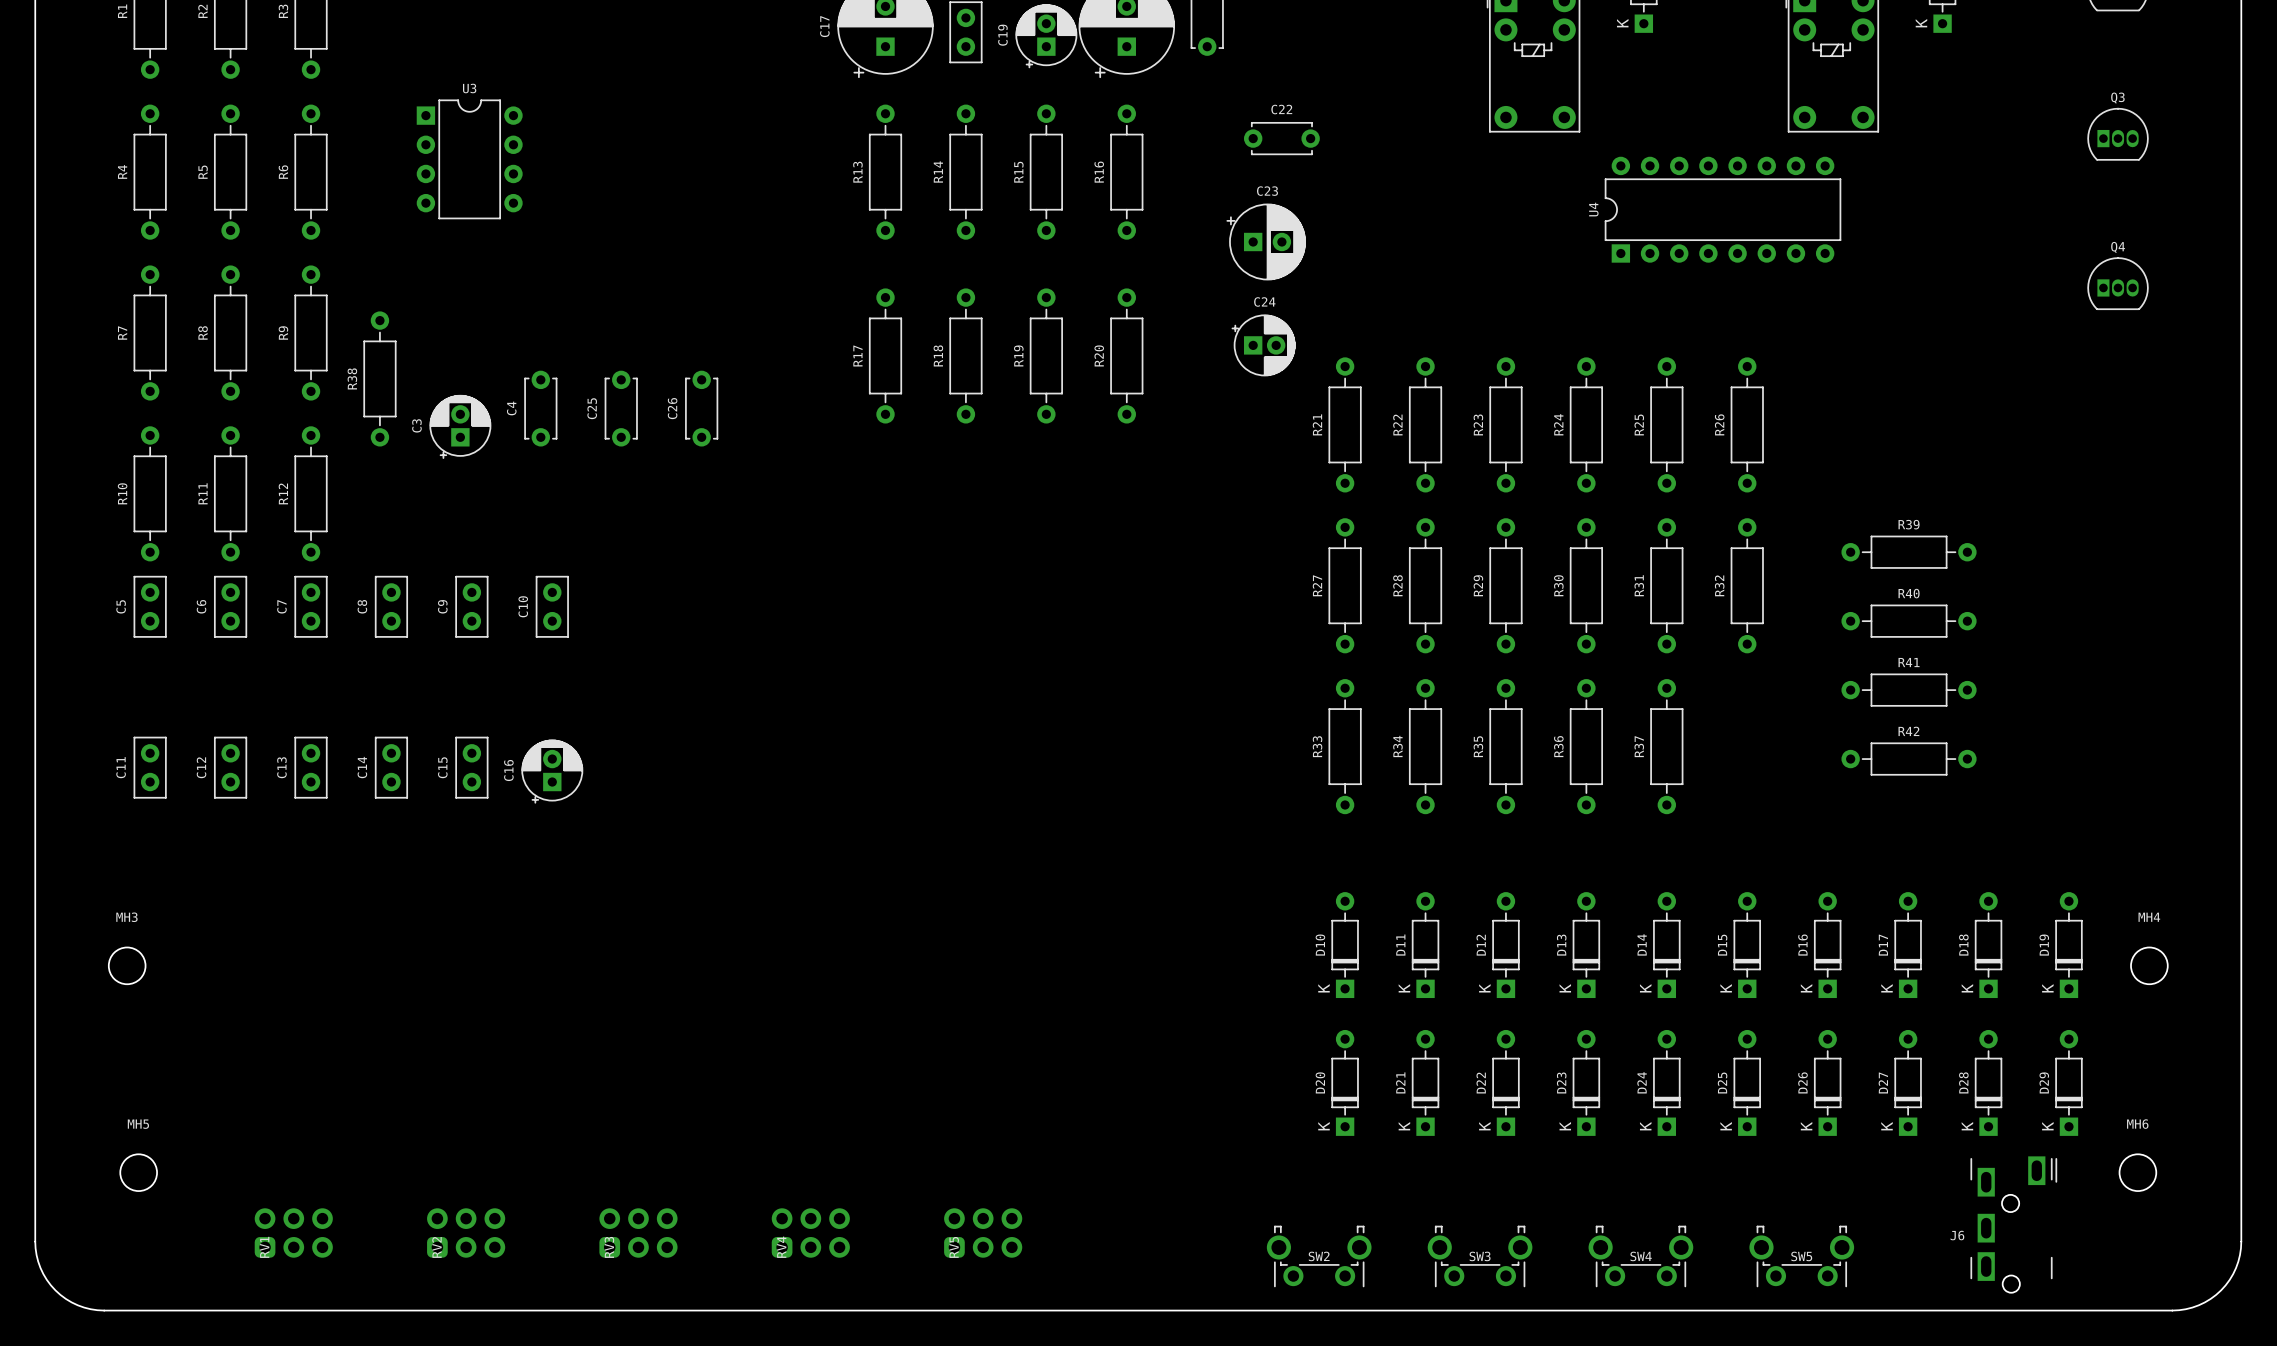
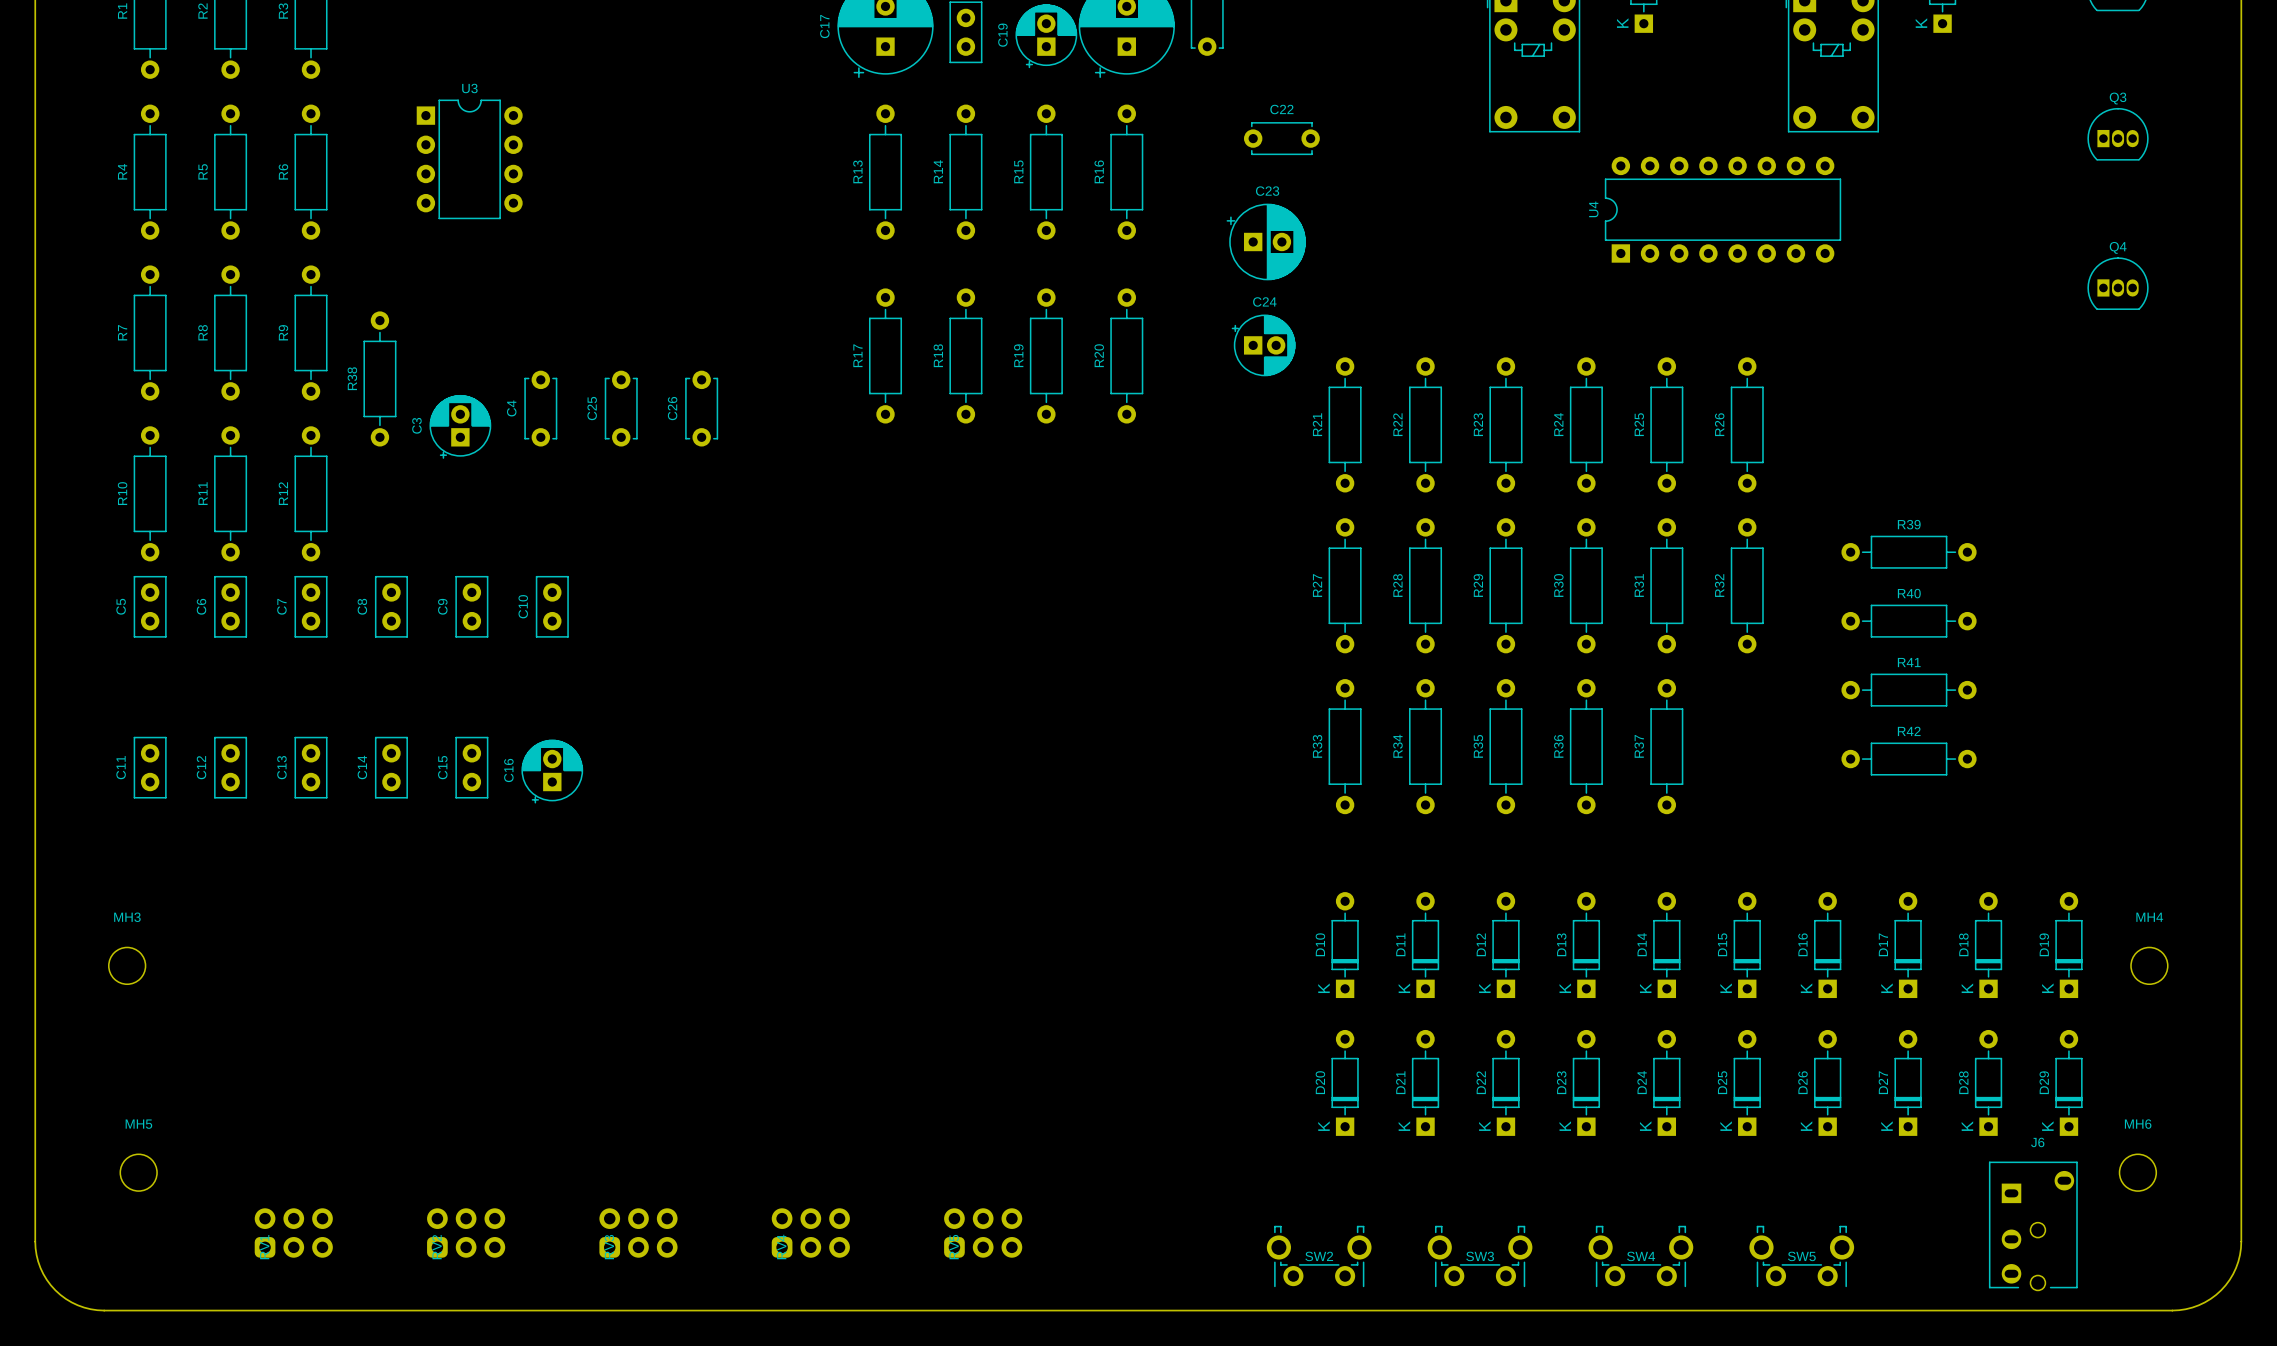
J6 footprint: [1970, 1156, 2058, 1293] -> [1988, 1161, 2078, 1291]
J6 name position: J6 (1957, 1235) -> J6 (2037, 1142)

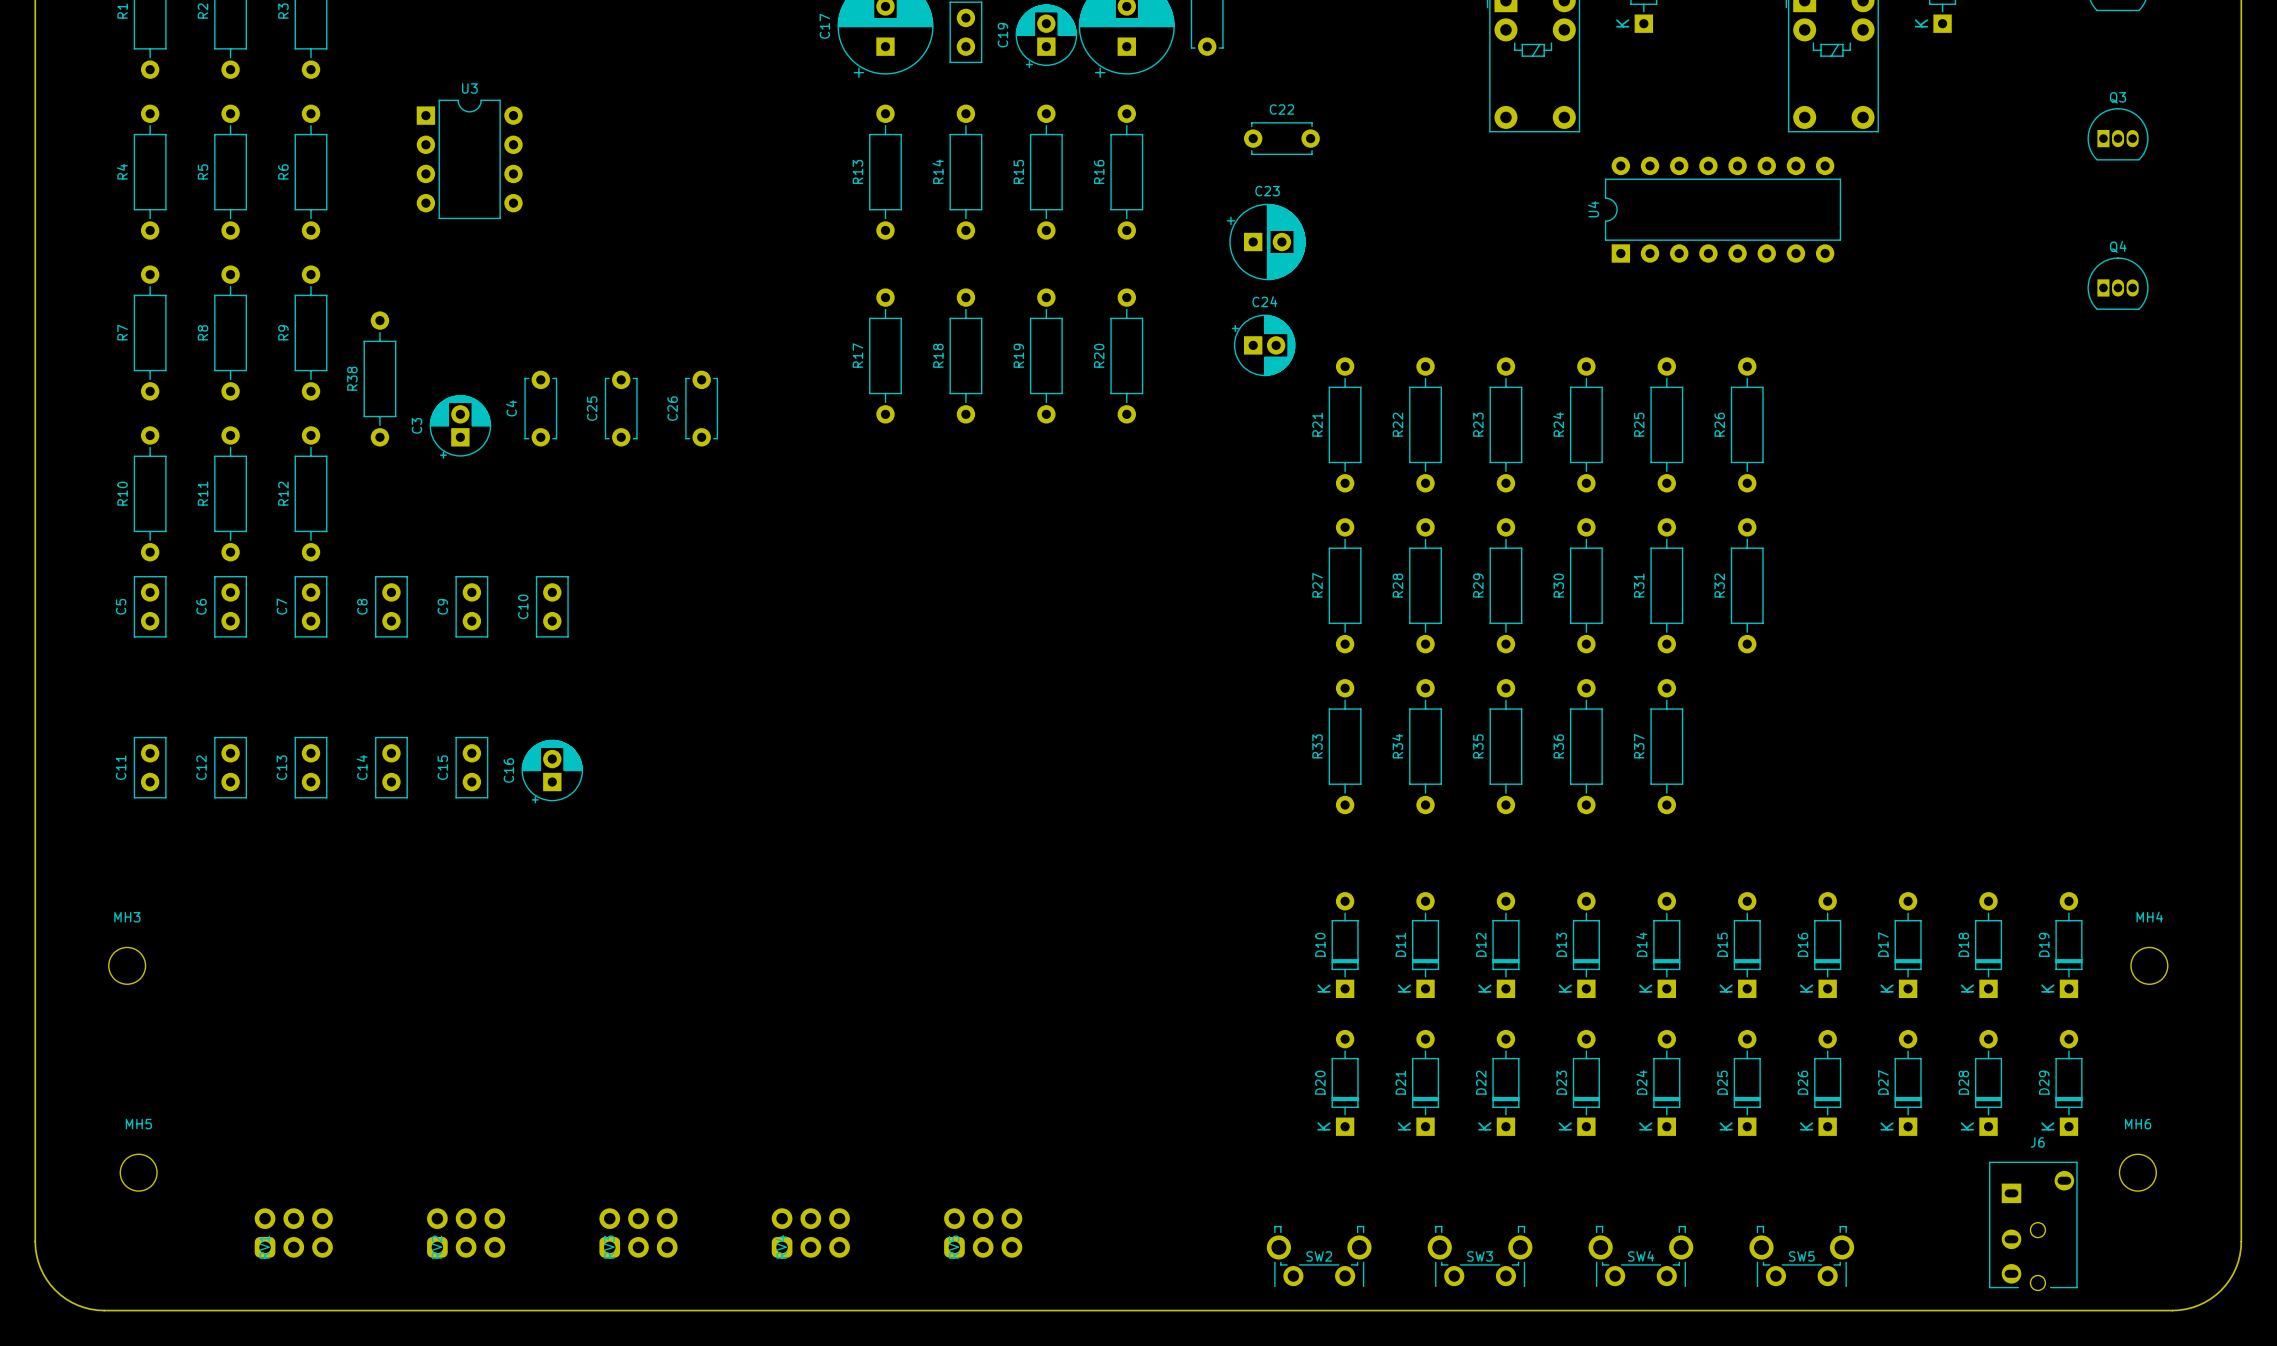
R39: (1909, 552) -> none
R40: (1909, 621) -> none
R41: (1909, 690) -> none
R42: (1909, 759) -> none

